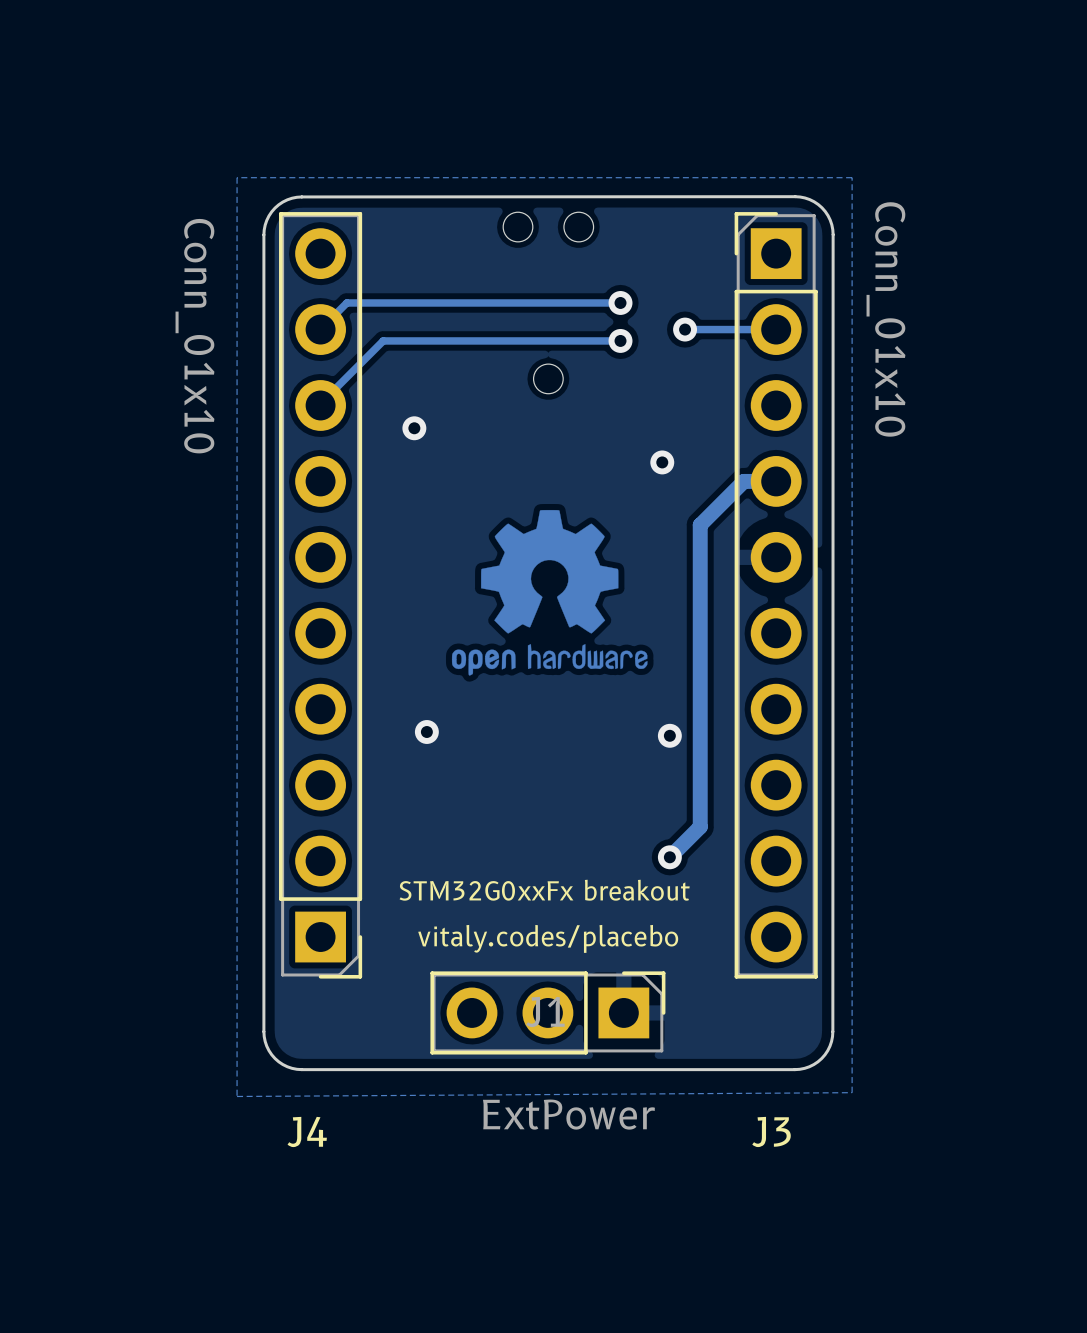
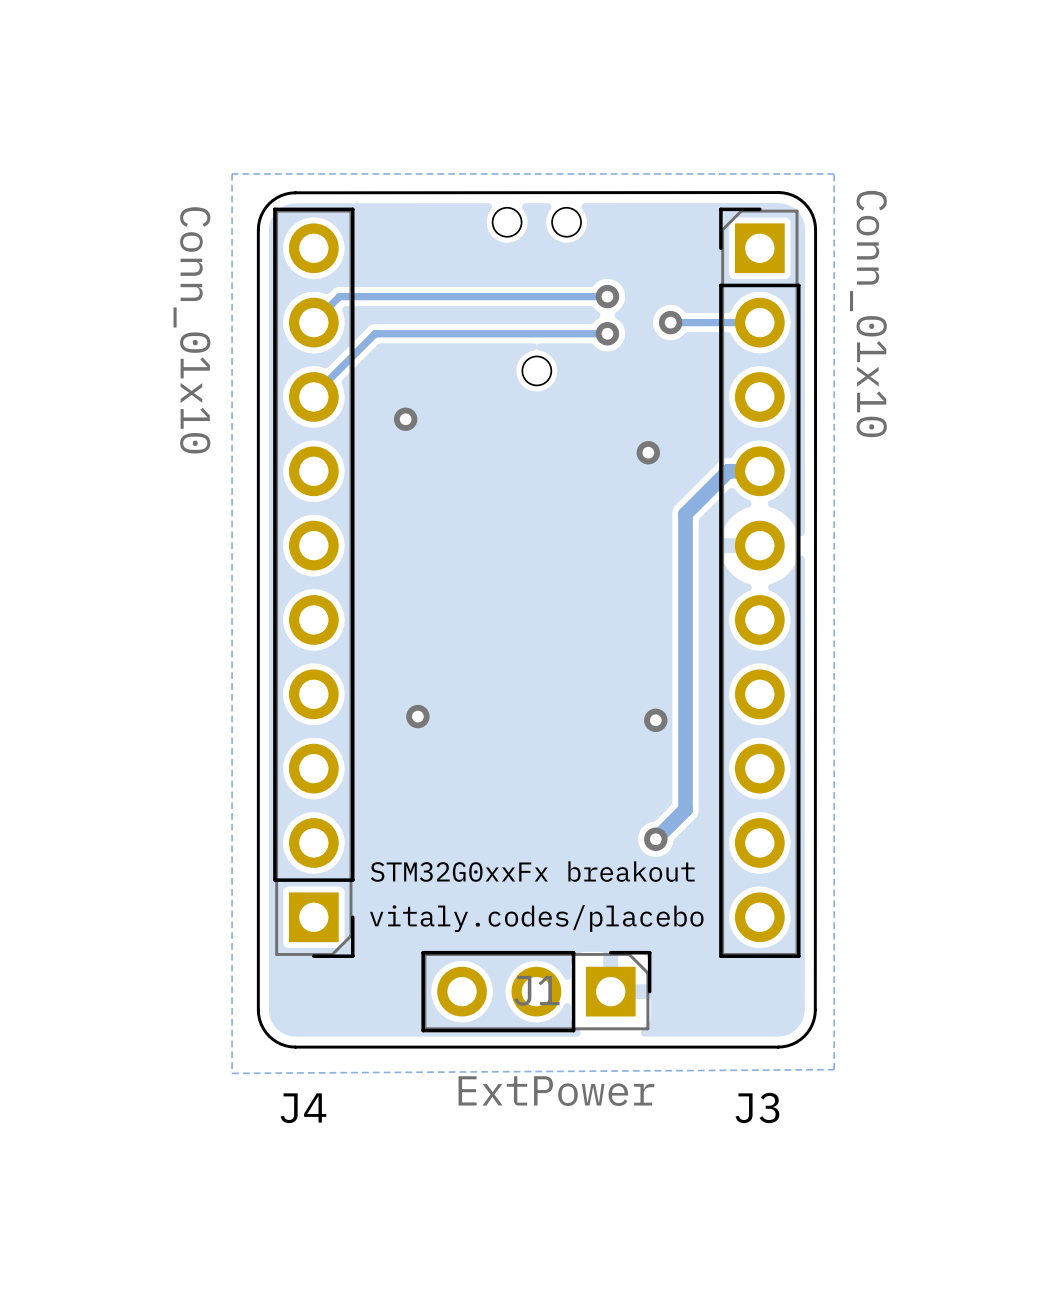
drawing: [451, 509, 648, 676] -> none

